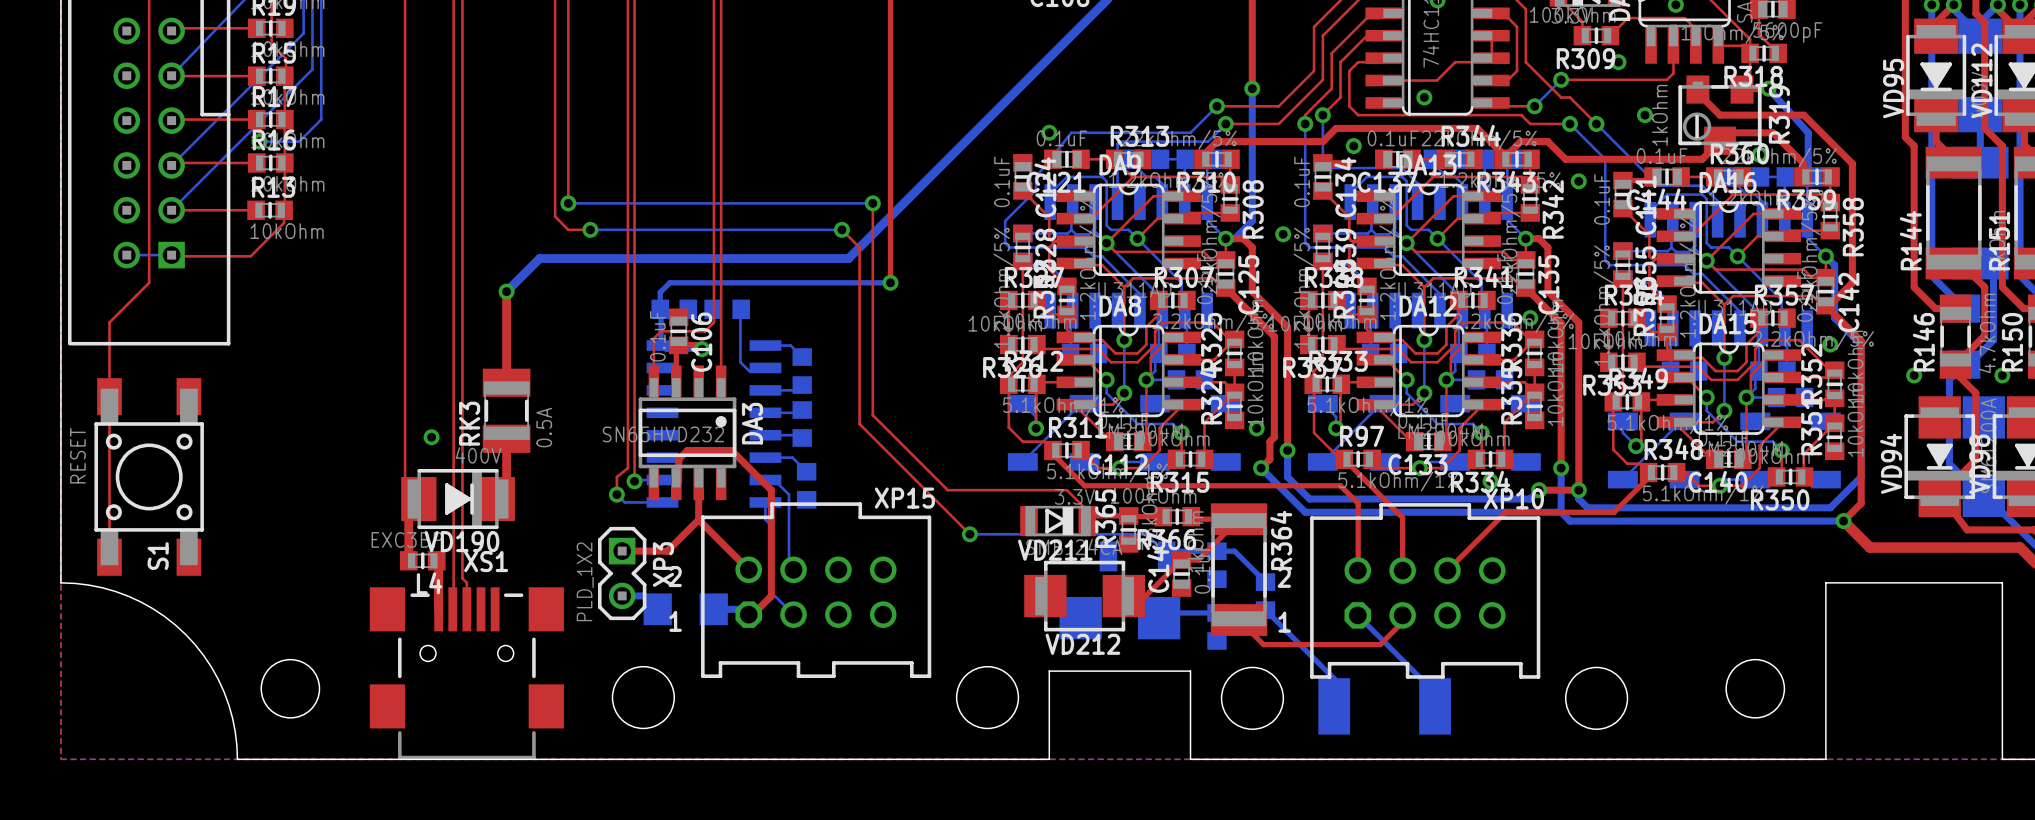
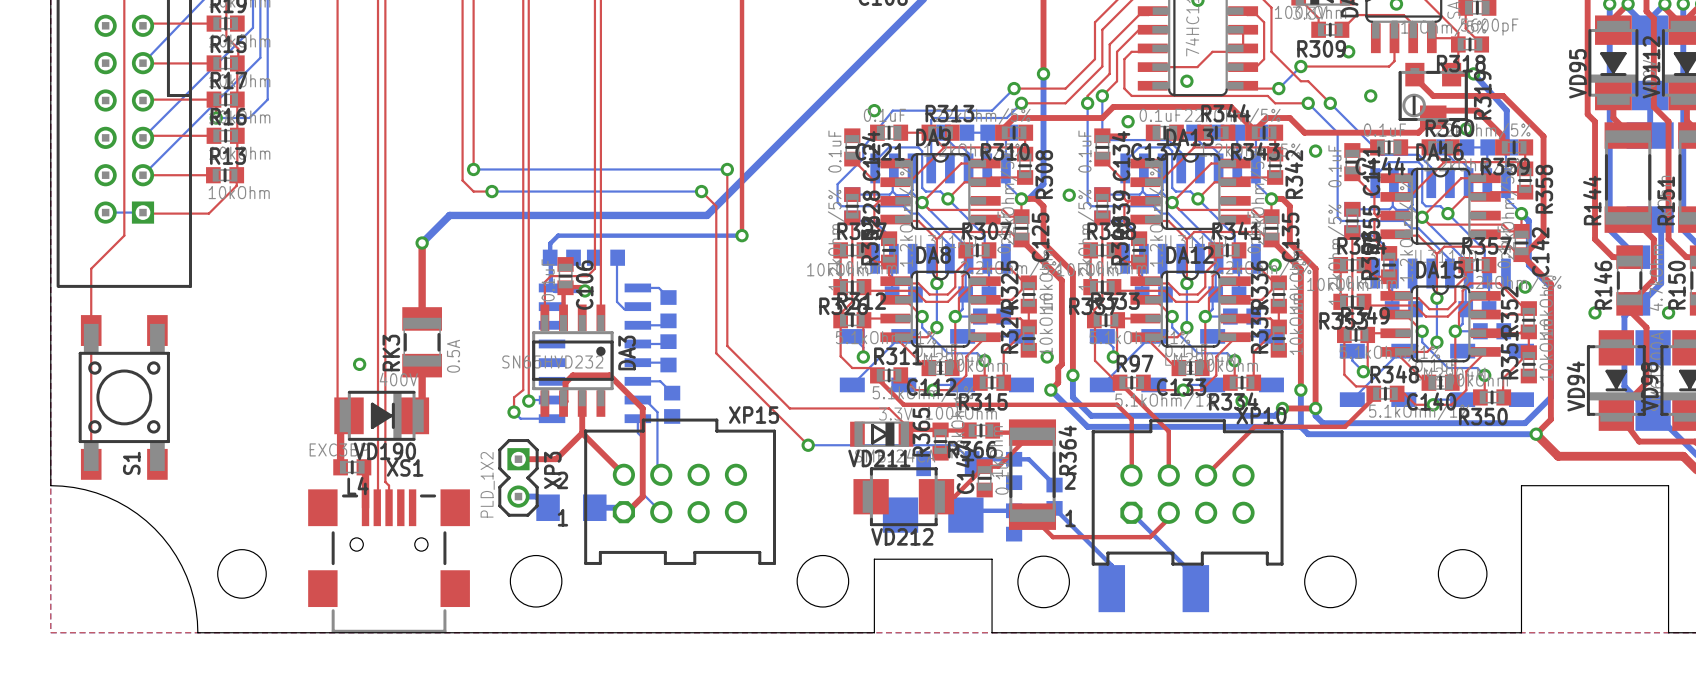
R319 value: 1kOhm (1659, 115) -> none
S1 value: RESET (77, 455) -> none

